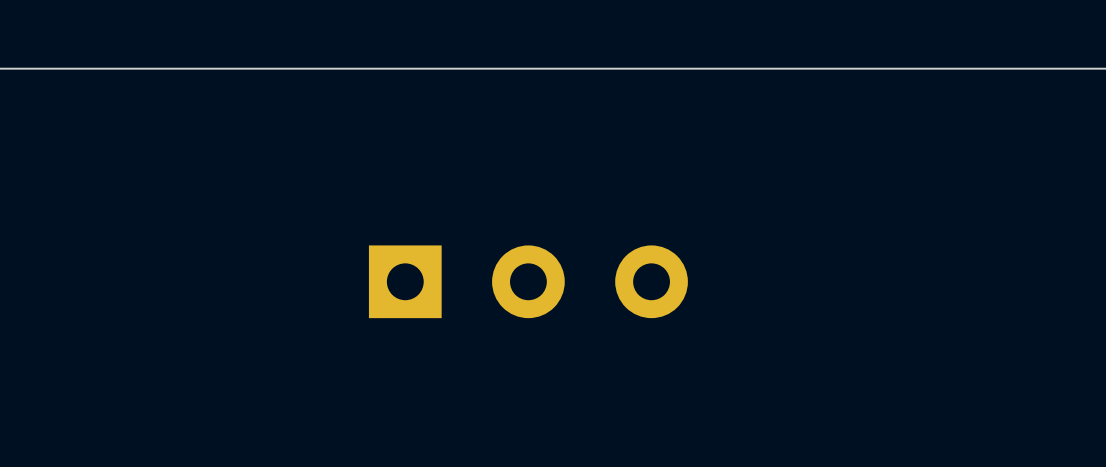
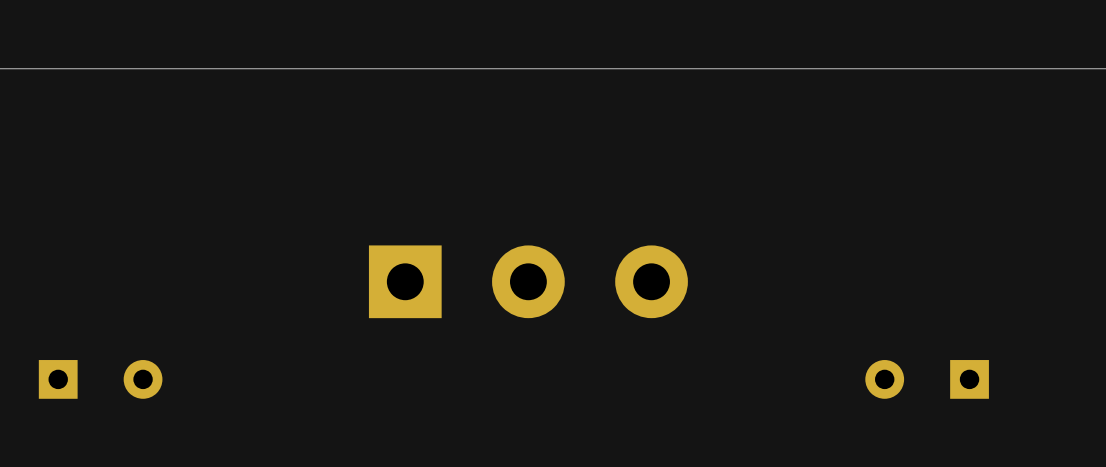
part: none -> (100, 379)
part: none -> (927, 379)

